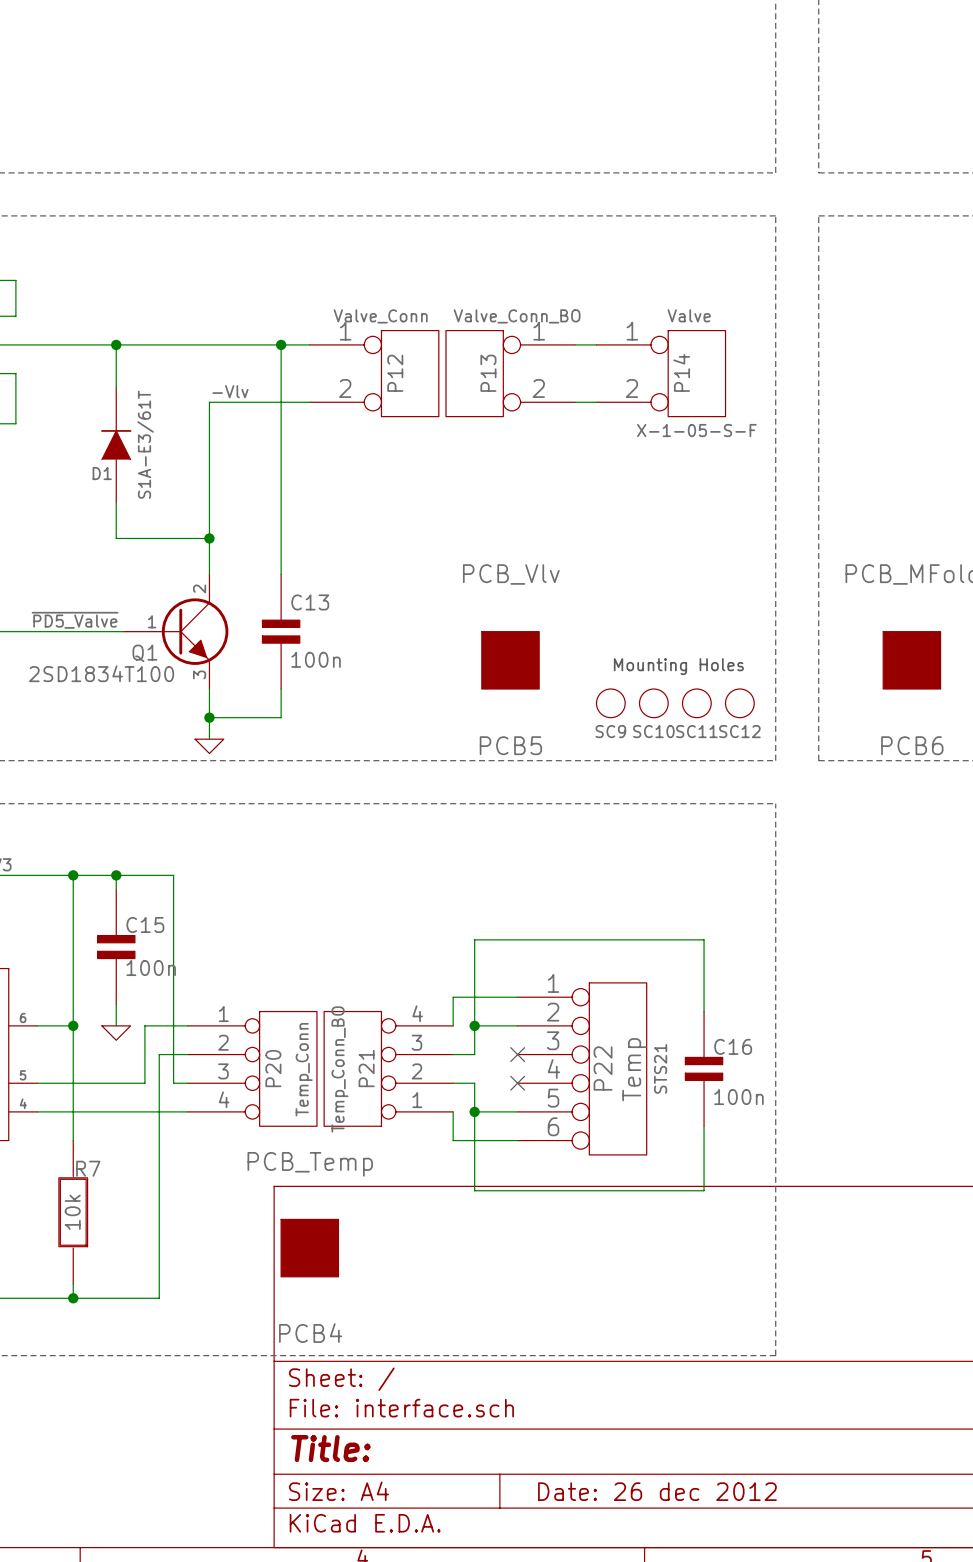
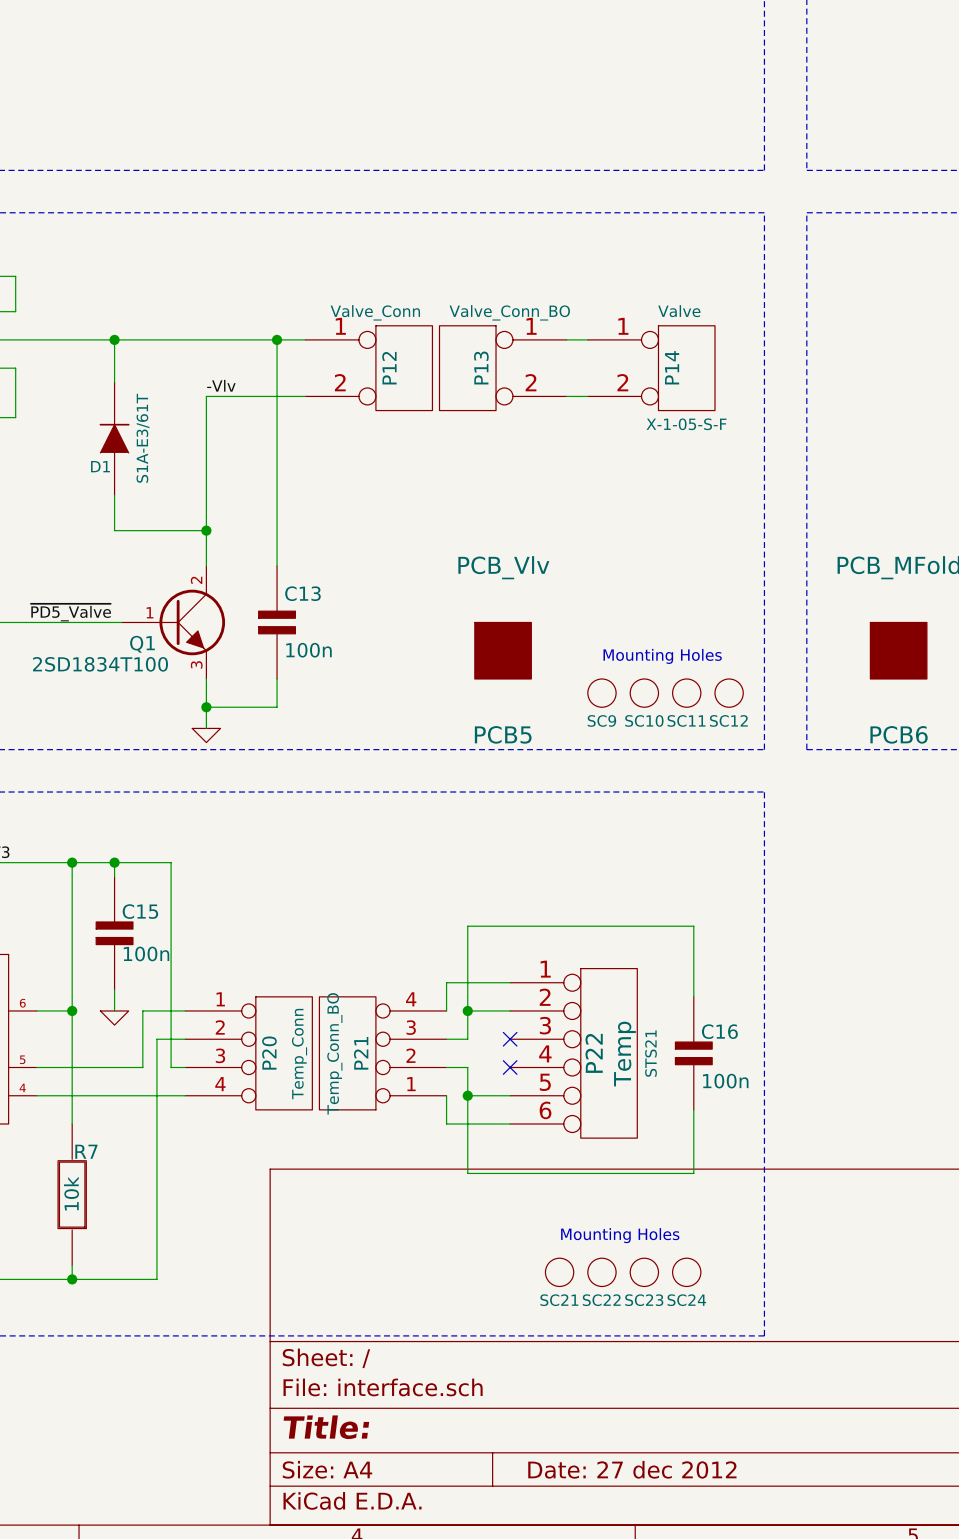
PCB4: PCB_Temp (309, 1248) -> none
text: none -> Mounting Holes (620, 1235)
SC21: none -> (559, 1272)
SC22: none -> (601, 1272)
SC23: none -> (644, 1272)
SC24: none -> (686, 1272)
title block: Date: 26 dec 2012 (657, 1491) -> Date: 27 dec 2012 (632, 1469)

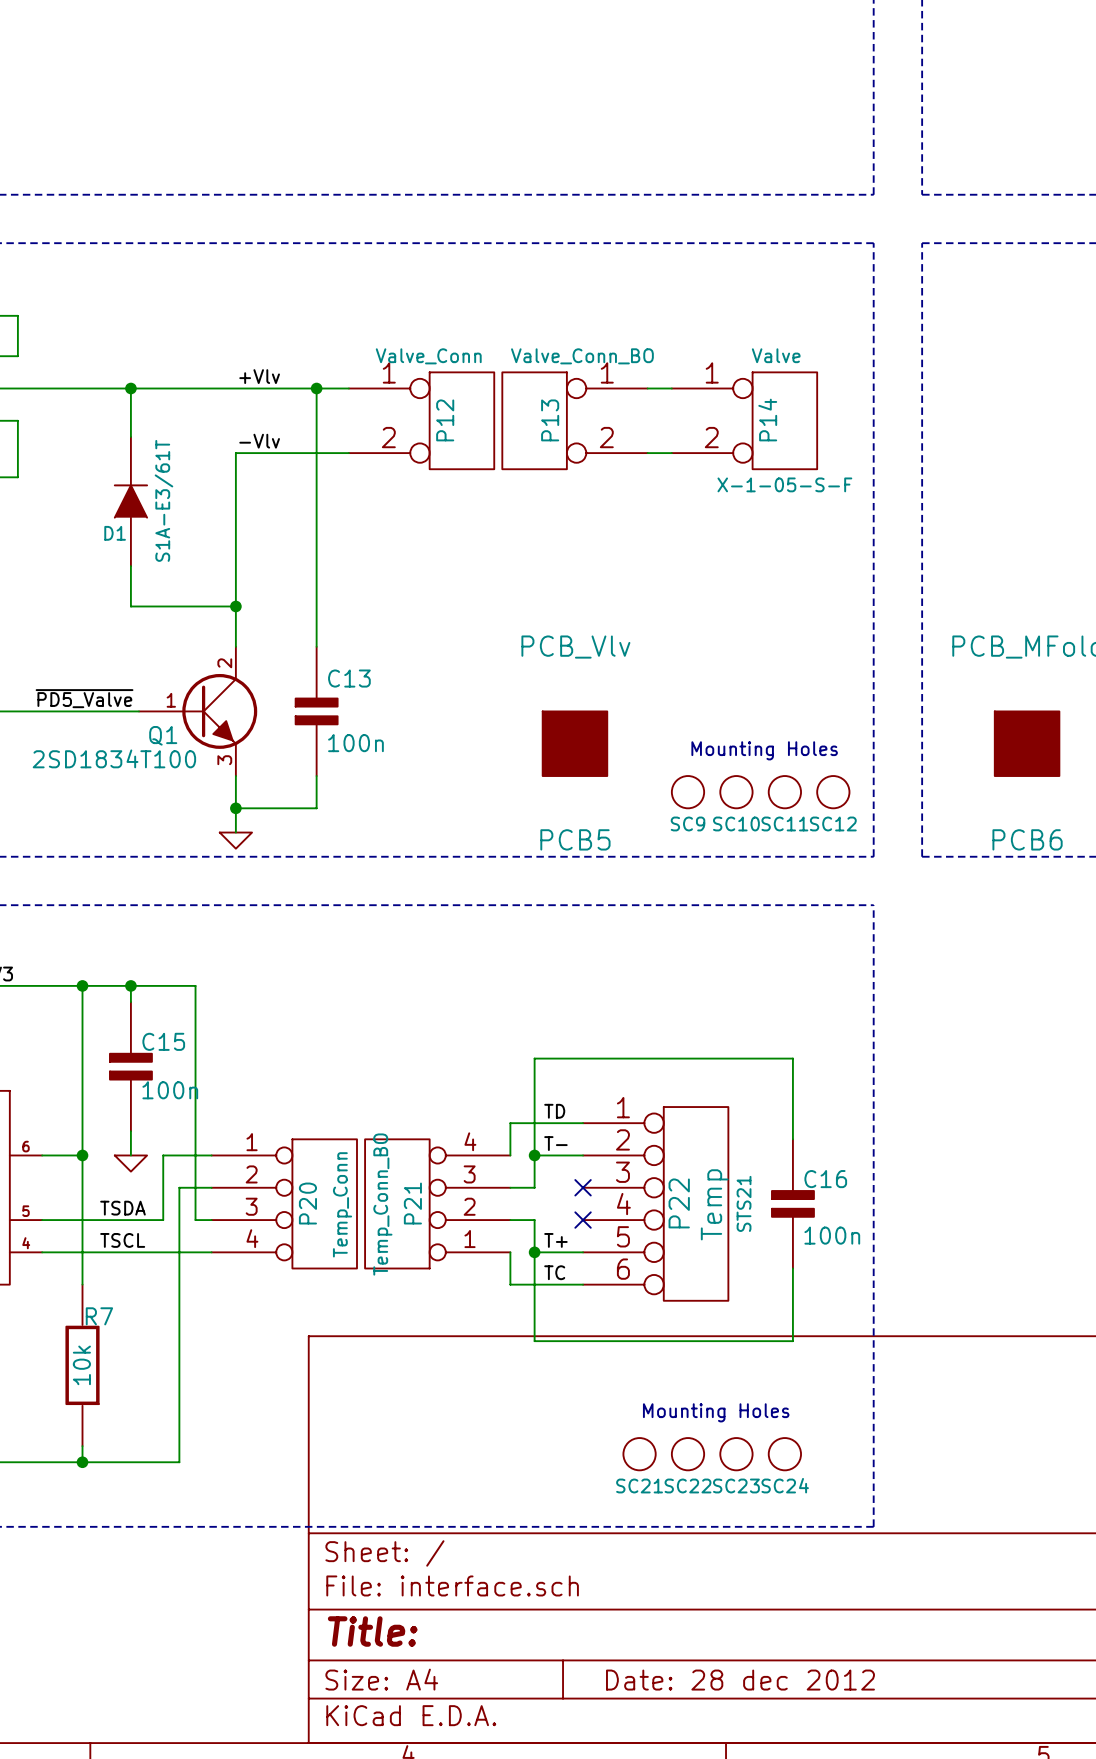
label: none -> +Vlv (259, 376)
label: none -> TD (554, 1111)
label: none -> T- (555, 1143)
label: none -> TSDA (122, 1208)
label: none -> TSCL (122, 1240)
label: none -> T+ (555, 1240)
label: none -> TC (554, 1272)
title block: Date: 27 dec 2012 (632, 1469) -> Date: 28 dec 2012 (740, 1680)

